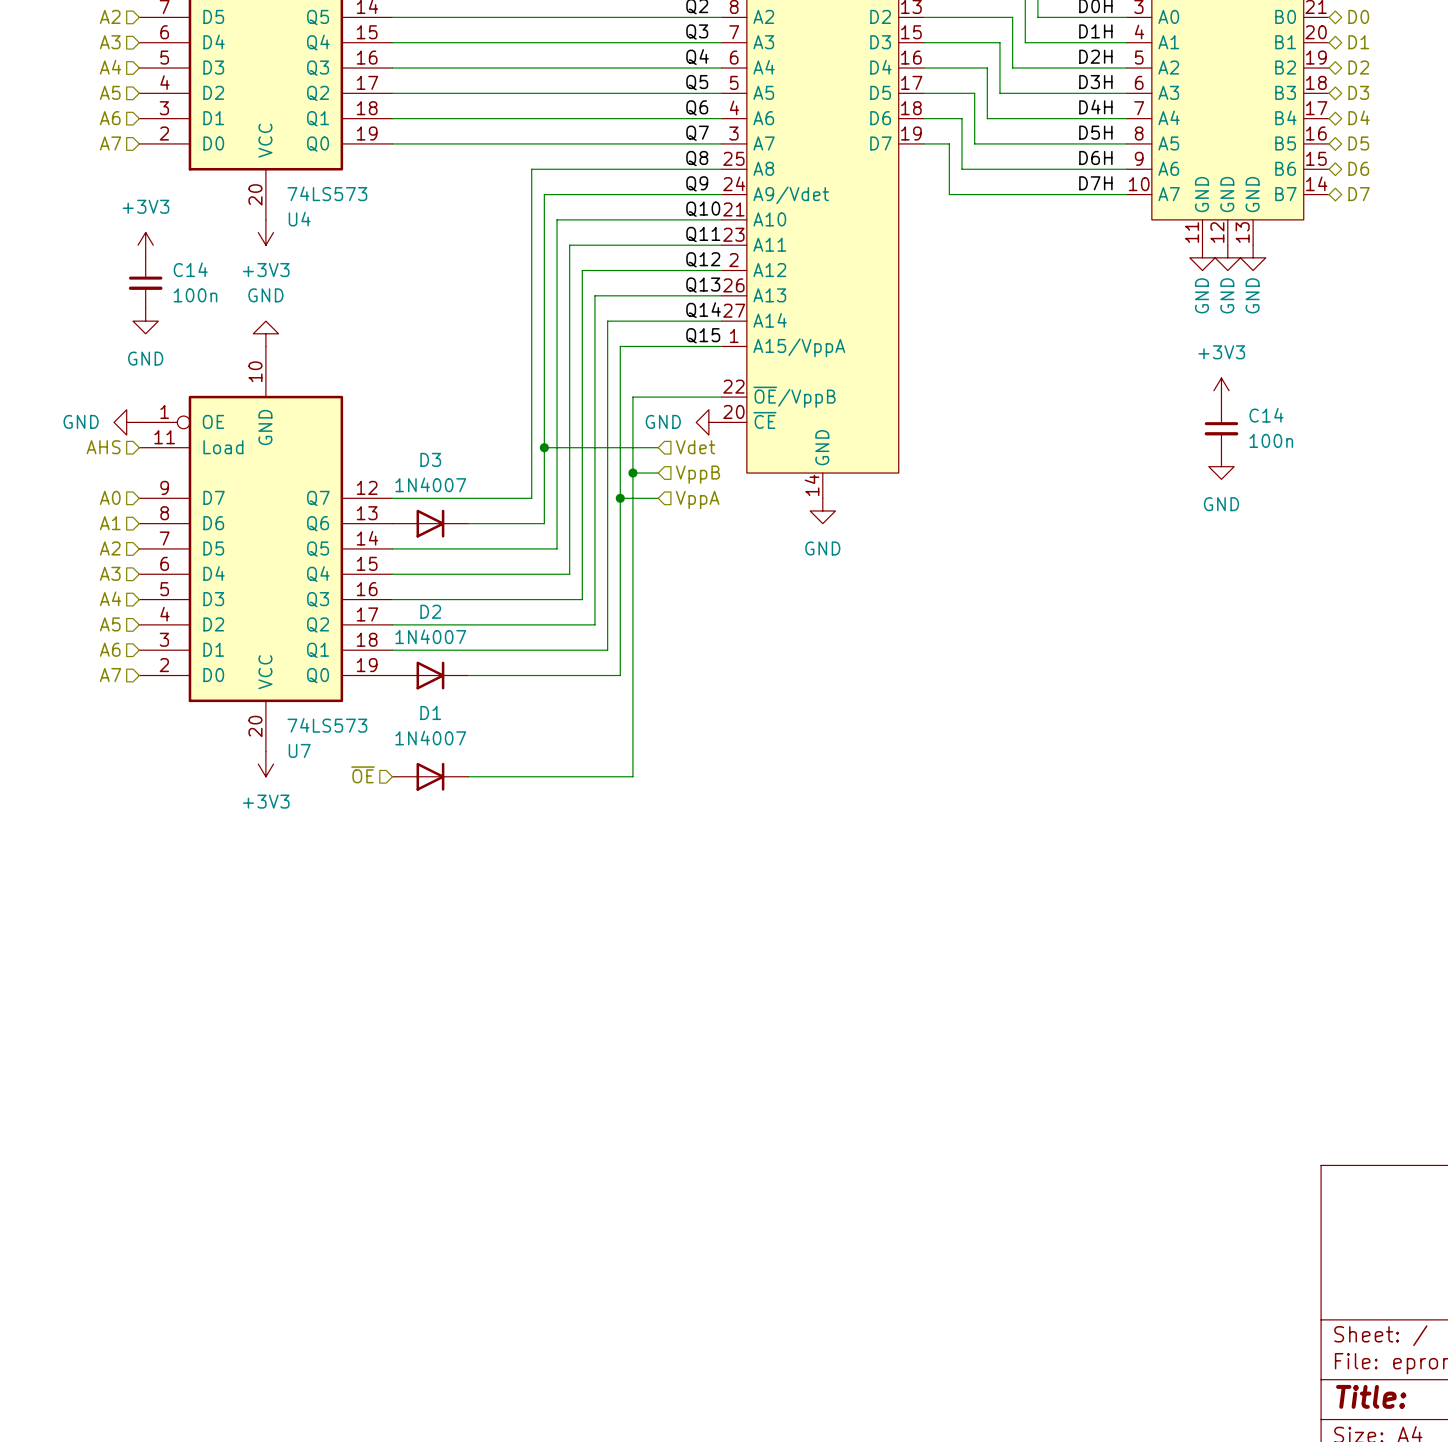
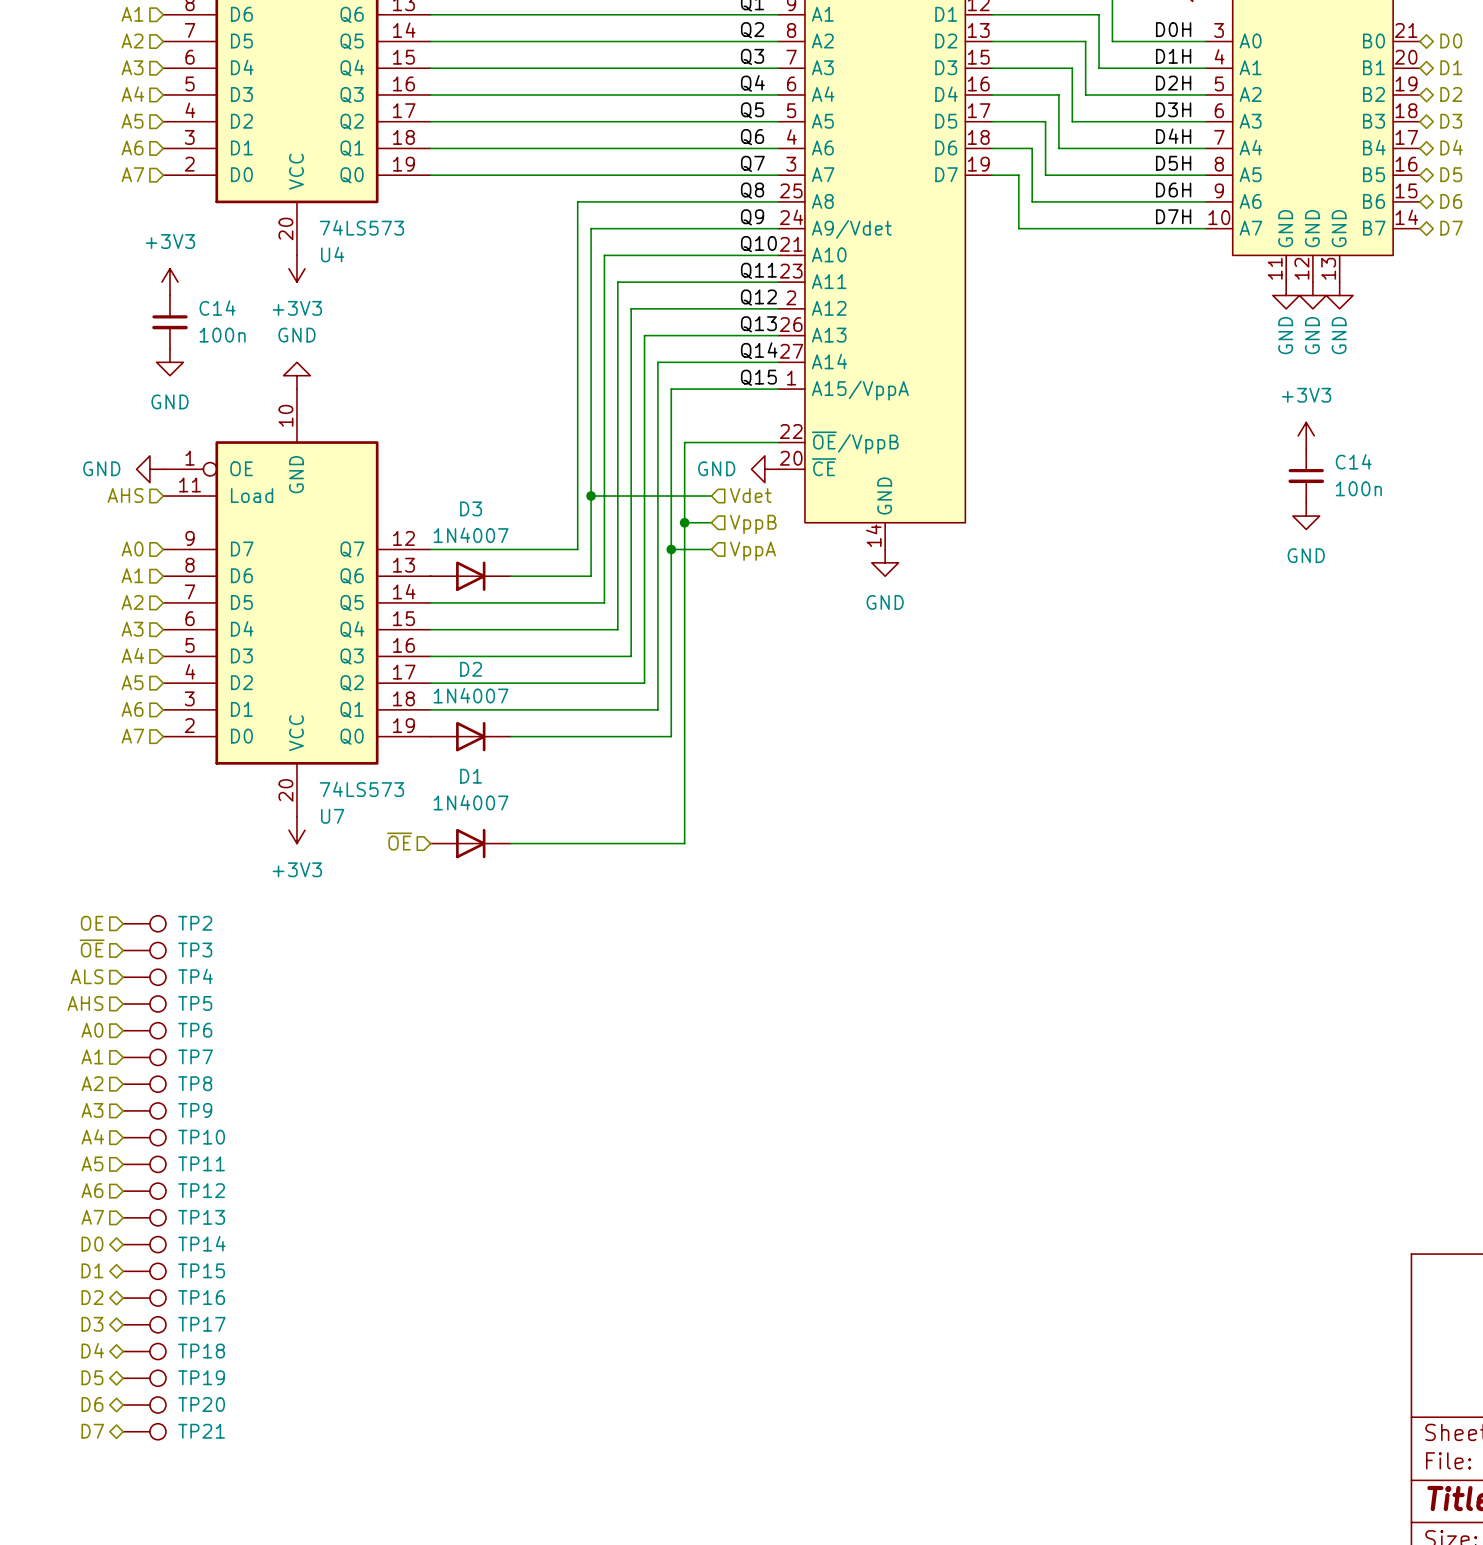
hierarchical label: none -> OE (92, 923)
TP2: none -> (144, 923)
hierarchical label: none -> ~{OE} (92, 948)
TP3: none -> (144, 950)
hierarchical label: none -> ALS (87, 976)
TP4: none -> (144, 977)
hierarchical label: none -> AHS (85, 1003)
TP5: none -> (144, 1003)
hierarchical label: none -> A0 (92, 1030)
TP6: none -> (144, 1030)
hierarchical label: none -> A1 (92, 1056)
TP7: none -> (144, 1057)
hierarchical label: none -> A2 (92, 1083)
TP8: none -> (144, 1084)
hierarchical label: none -> A3 (92, 1110)
TP9: none -> (144, 1110)
hierarchical label: none -> A4 (92, 1136)
TP10: none -> (144, 1137)
hierarchical label: none -> A5 (92, 1163)
TP11: none -> (144, 1164)
hierarchical label: none -> A6 (92, 1190)
TP12: none -> (144, 1191)
hierarchical label: none -> A7 (92, 1217)
TP13: none -> (144, 1217)
hierarchical label: none -> D0 (92, 1244)
TP14: none -> (144, 1244)
hierarchical label: none -> D1 (92, 1270)
TP15: none -> (144, 1271)
hierarchical label: none -> D2 (92, 1297)
TP16: none -> (144, 1298)
hierarchical label: none -> D3 (92, 1324)
TP17: none -> (144, 1324)
hierarchical label: none -> D4 (92, 1350)
TP18: none -> (144, 1351)
hierarchical label: none -> D5 (92, 1377)
TP19: none -> (144, 1378)
hierarchical label: none -> D6 (92, 1404)
TP20: none -> (144, 1405)
hierarchical label: none -> D7 (92, 1431)
TP21: none -> (144, 1431)

